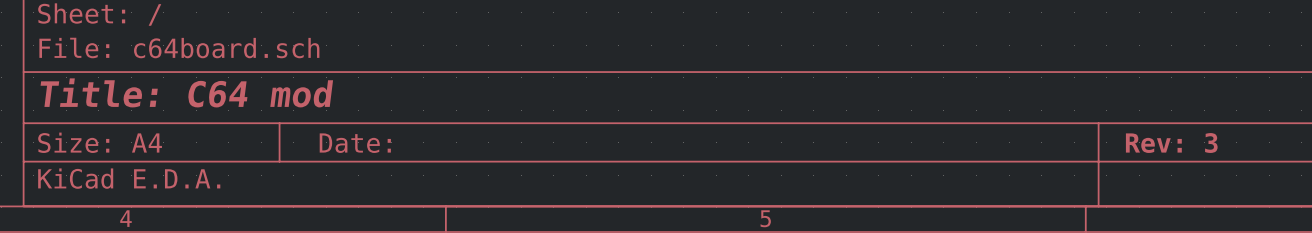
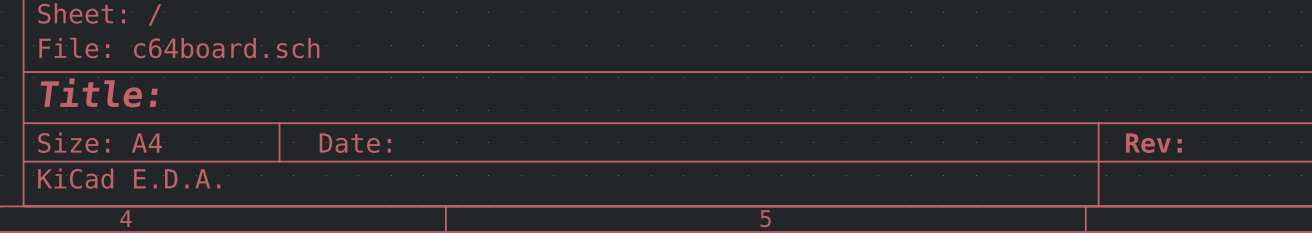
title block: Title: C64 mod (186, 92) -> Title: (99, 92)
title block: Rev: 3 (1171, 143) -> Rev: (1153, 143)

